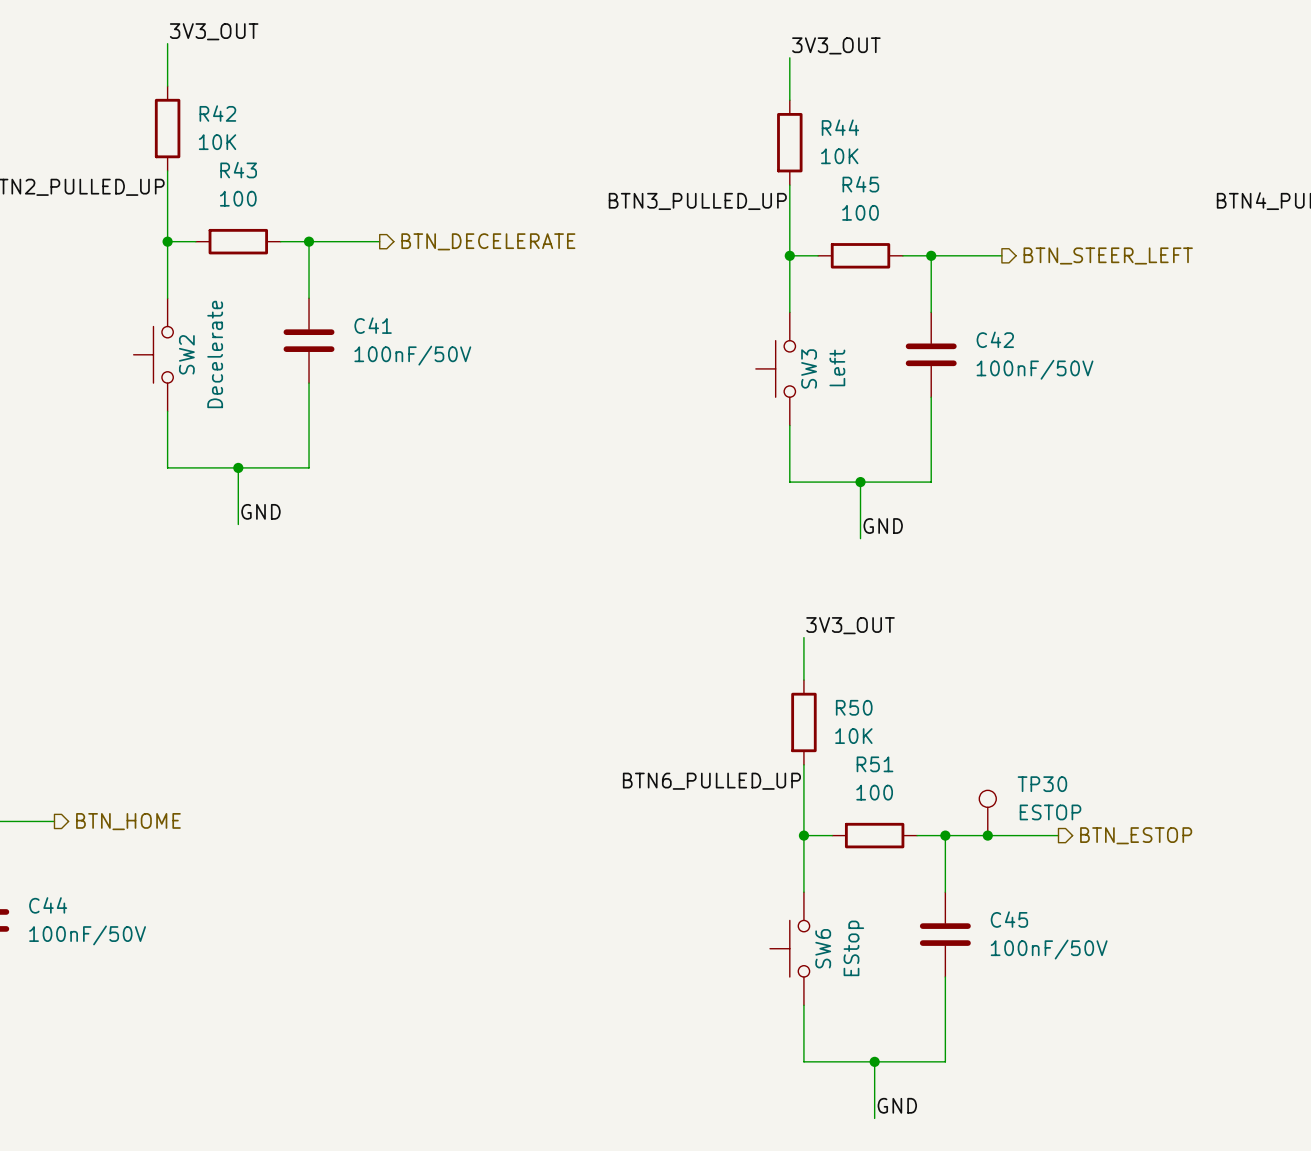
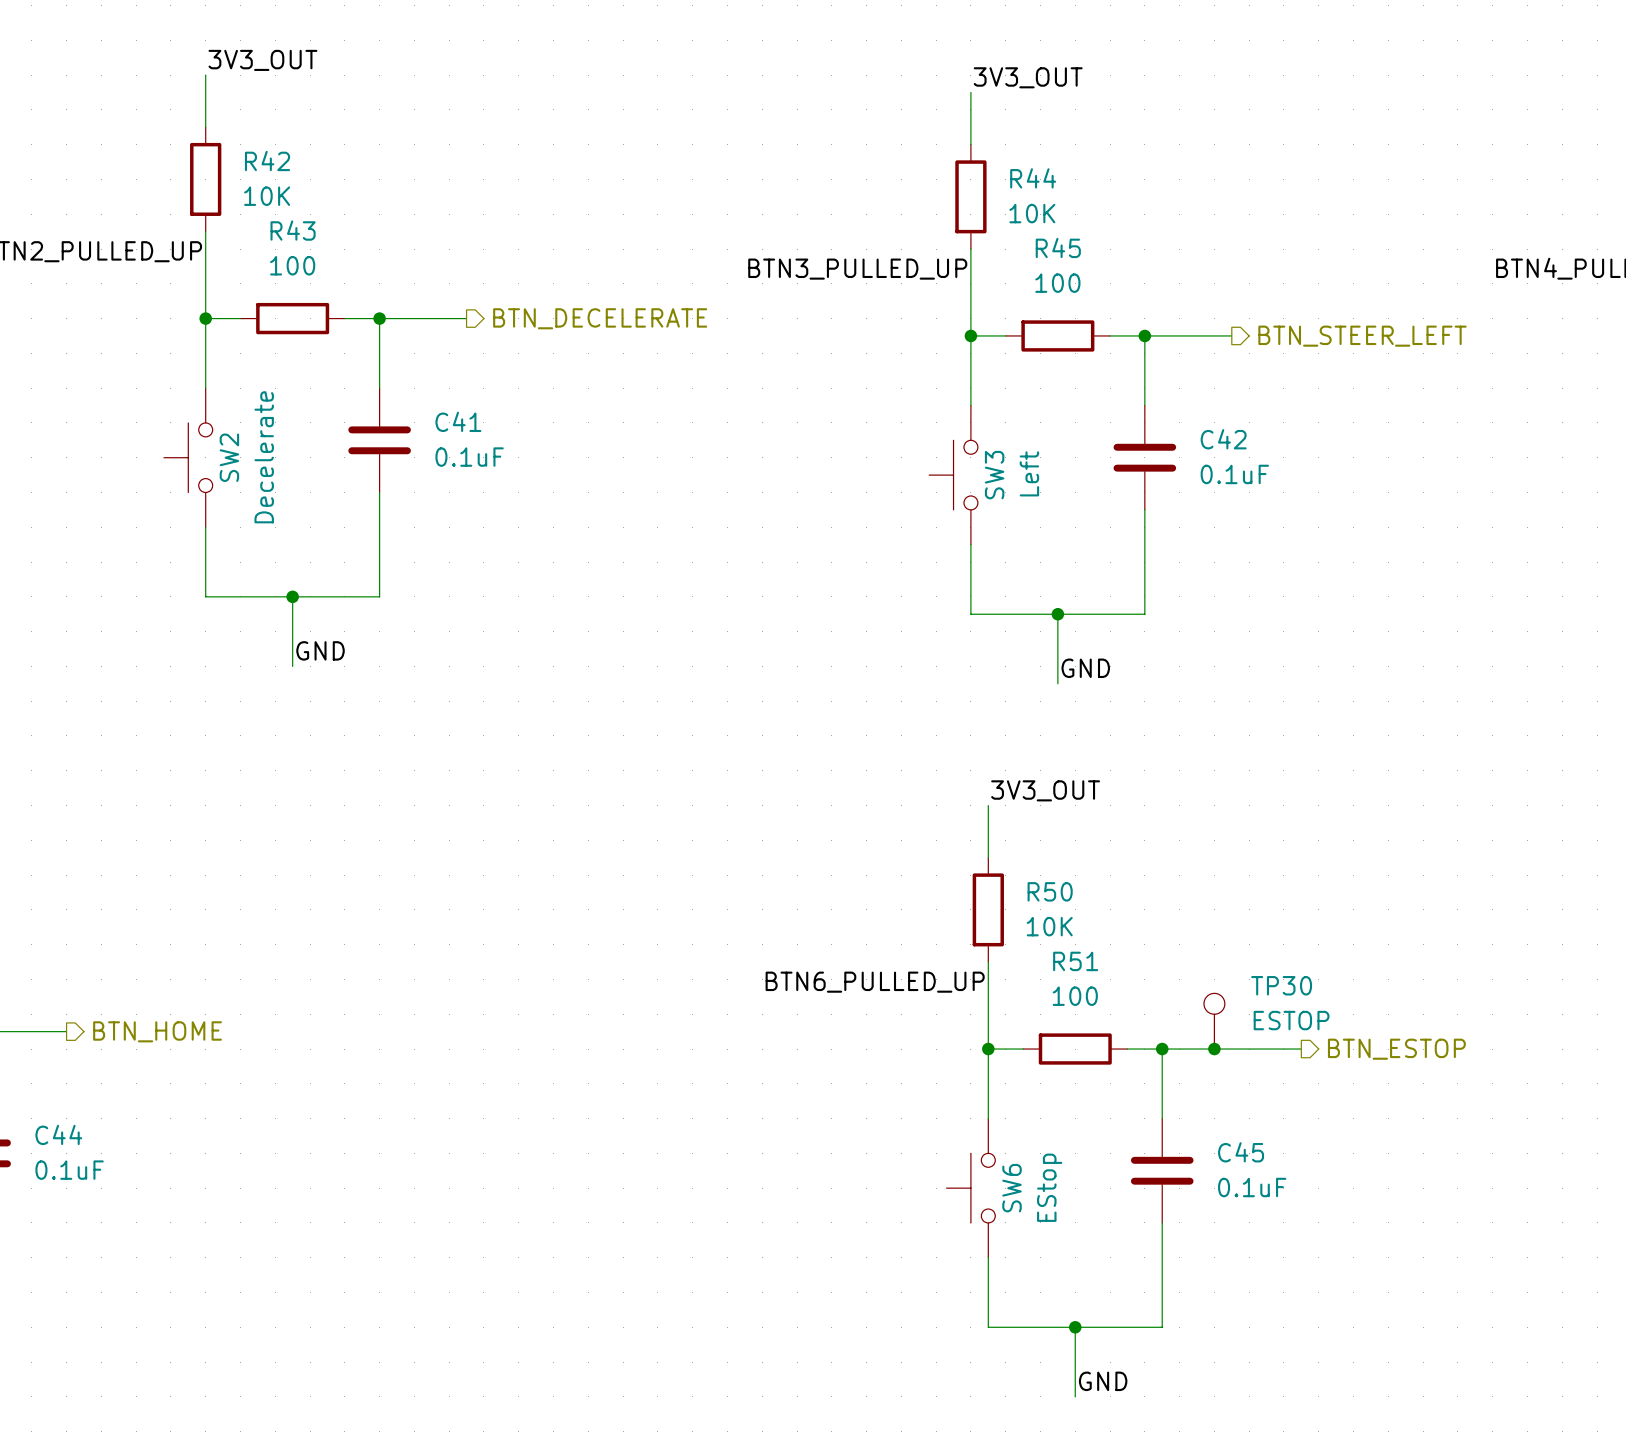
C41 value: 100nF/50V (412, 355) -> 0.1uF (469, 457)
C42 value: 100nF/50V (1035, 369) -> 0.1uF (1234, 474)
C44 value: 100nF/50V (87, 935) -> 0.1uF (69, 1170)
C45 value: 100nF/50V (1049, 949) -> 0.1uF (1252, 1187)

